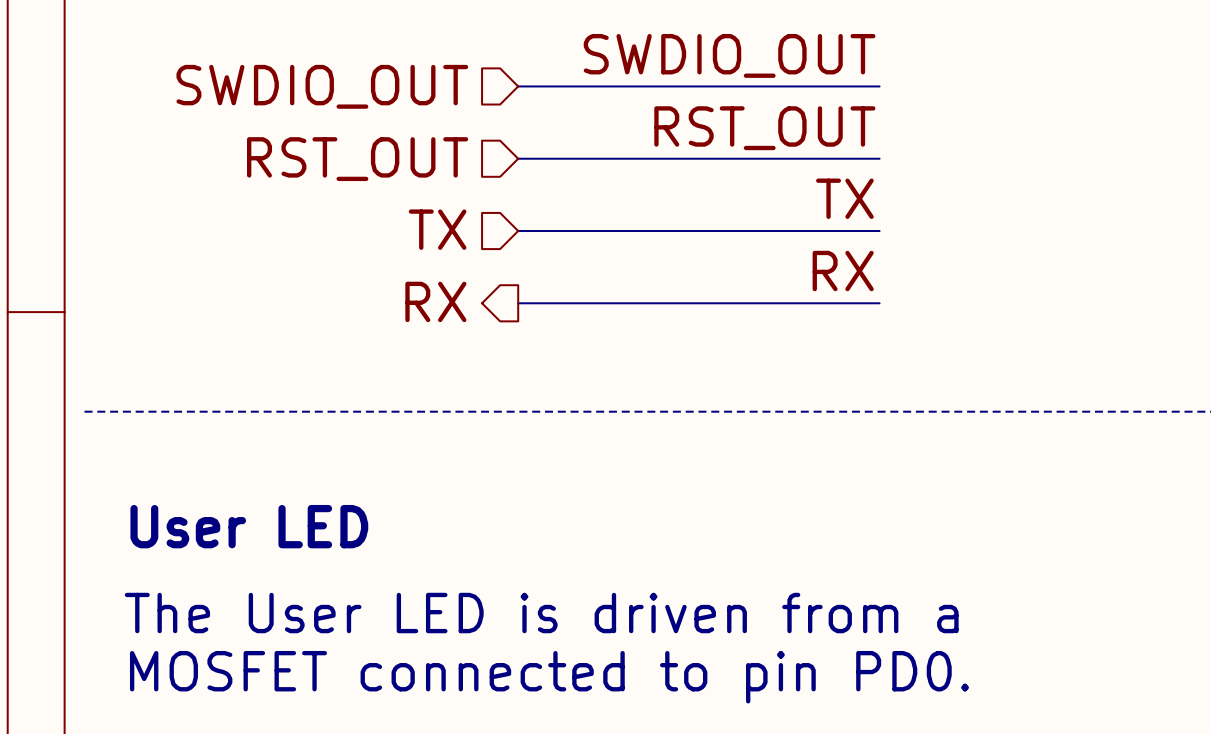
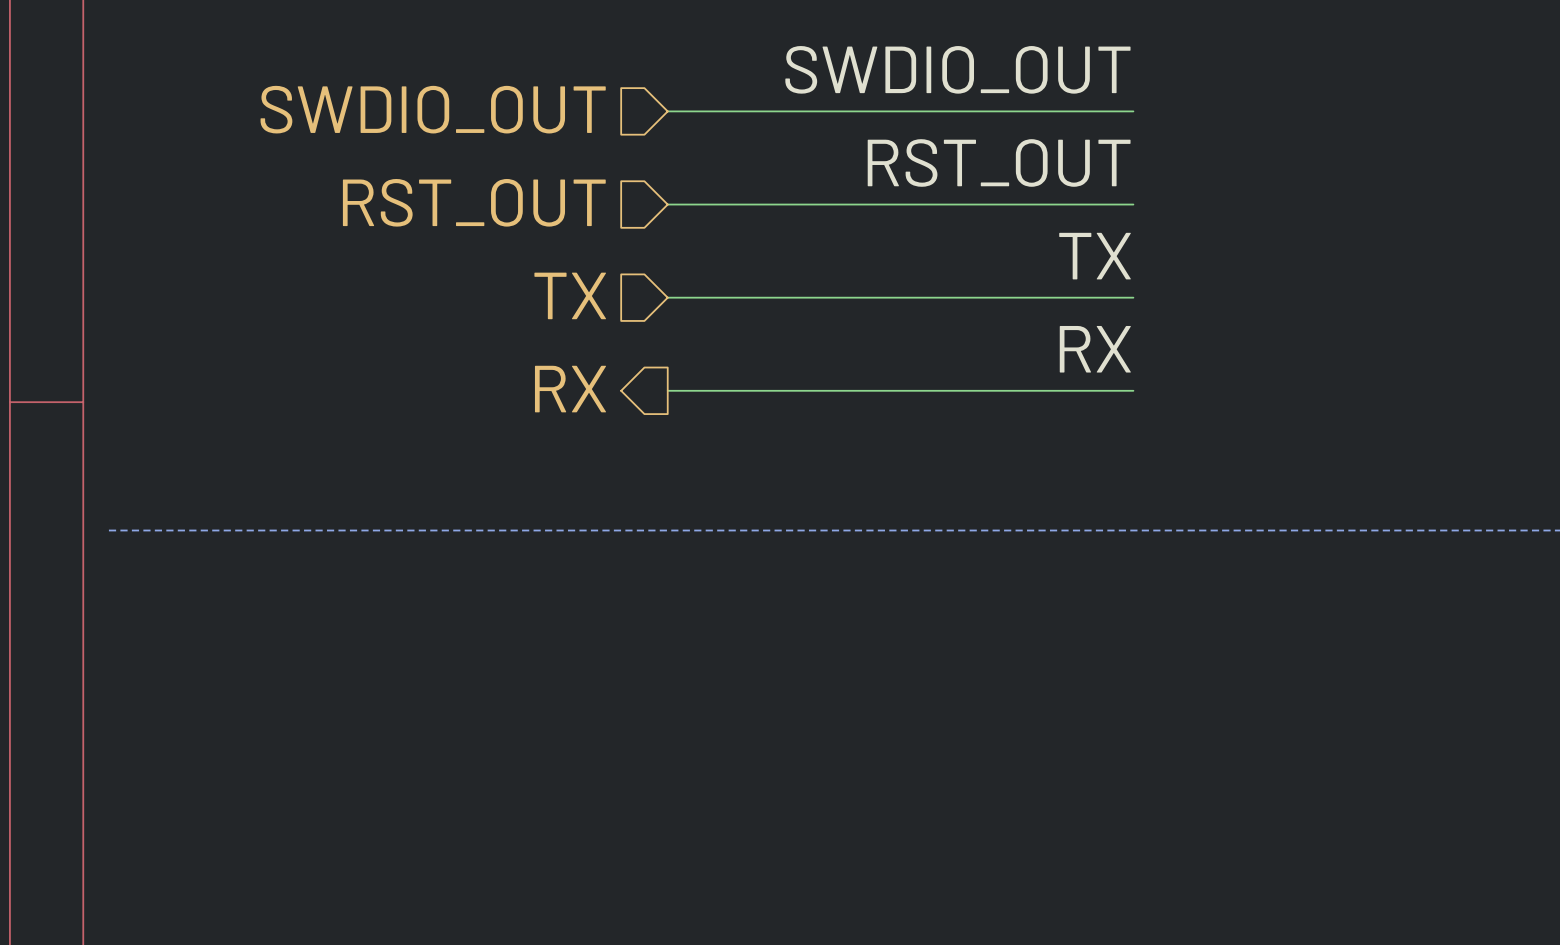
text: User LED (249, 526) -> none
text: The User LED is driven from a (541, 613) -> none
text: MOSFET connected to pin PD0. (549, 677) -> none

